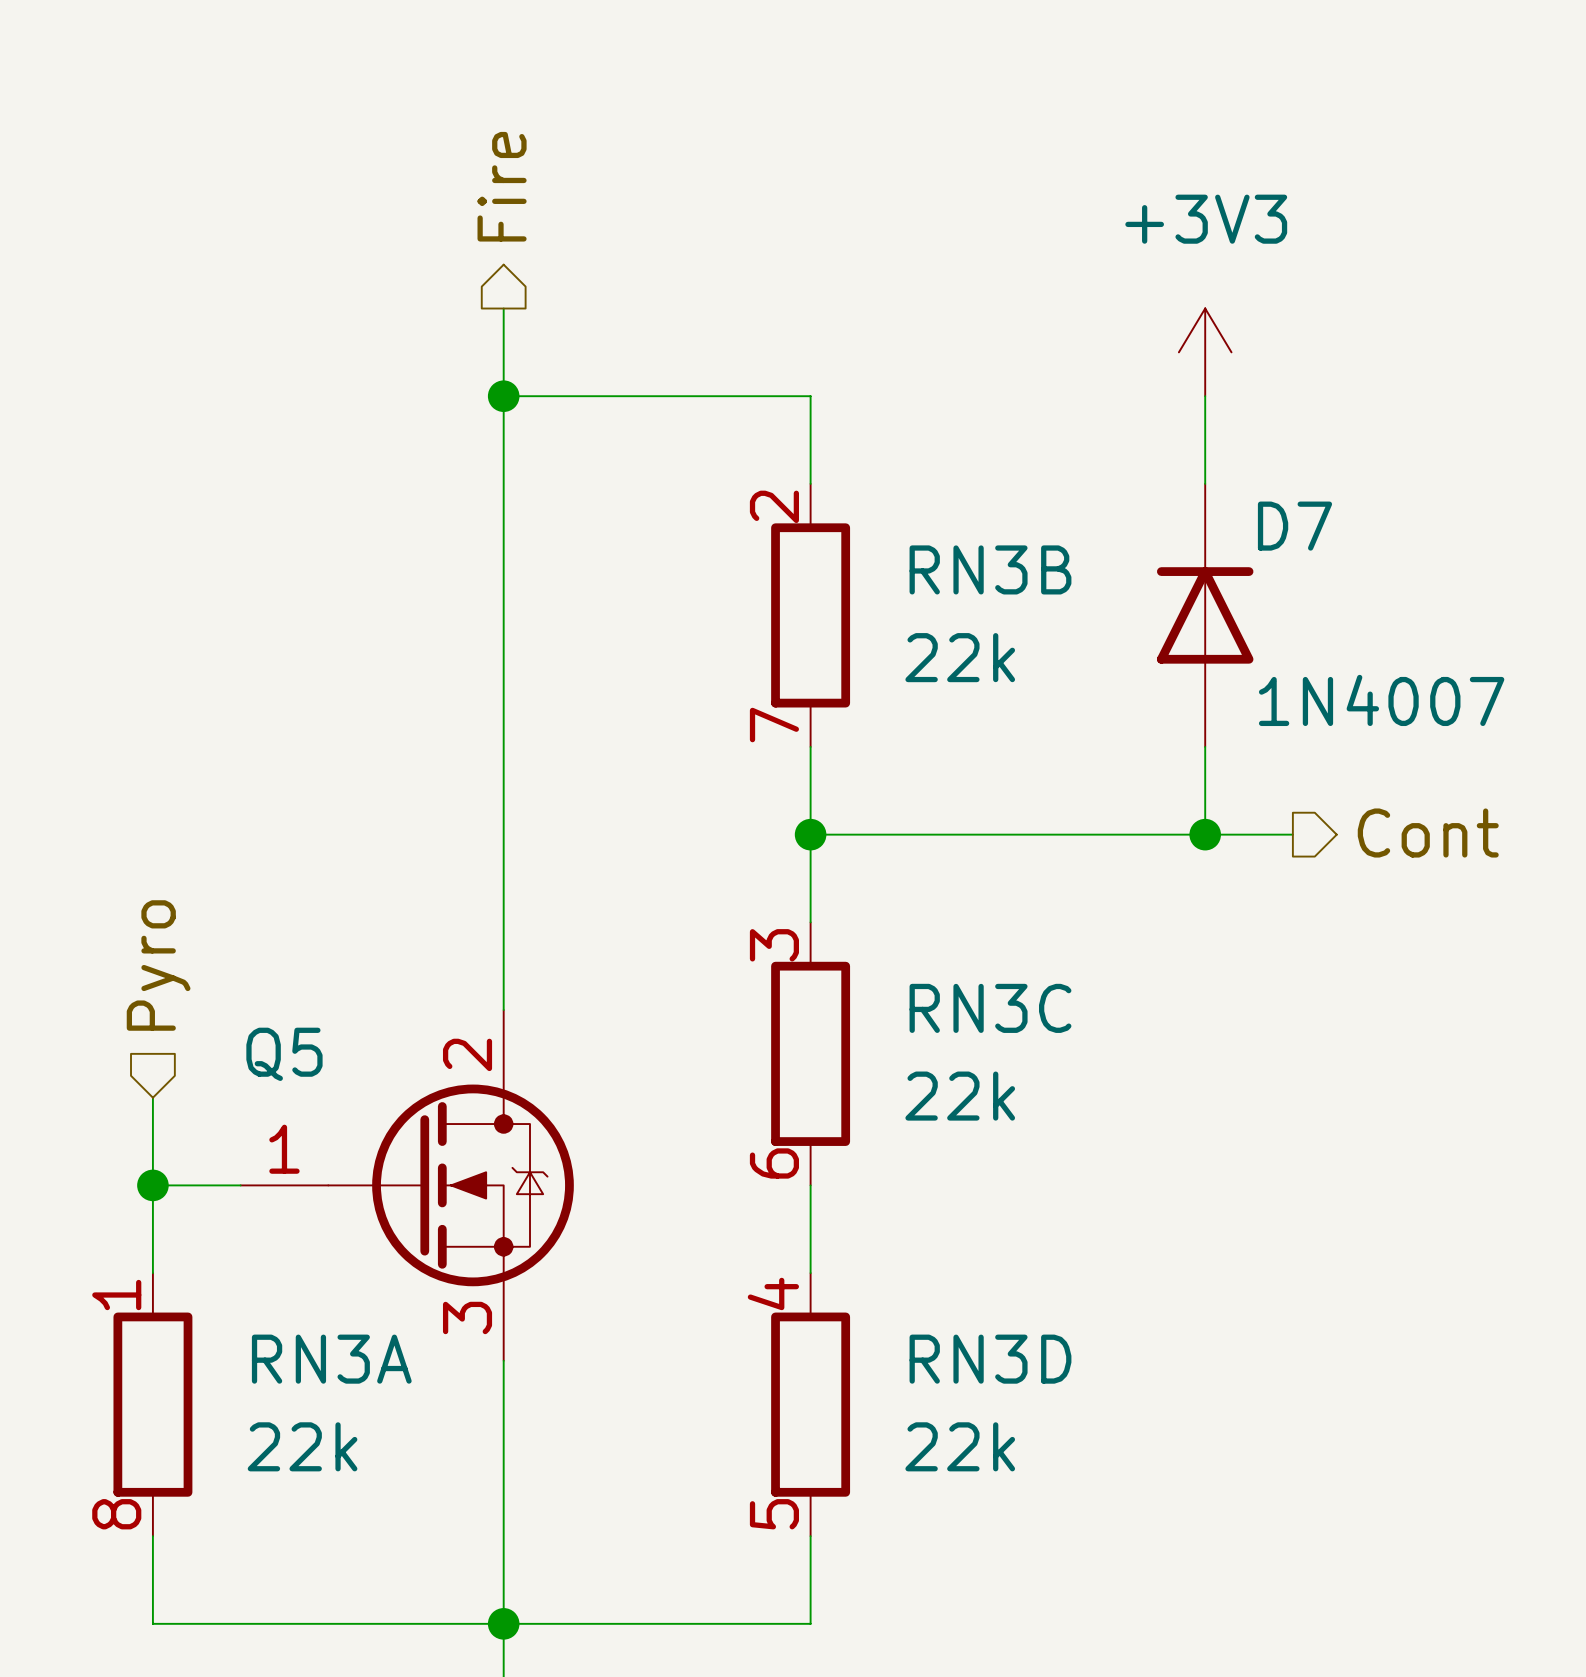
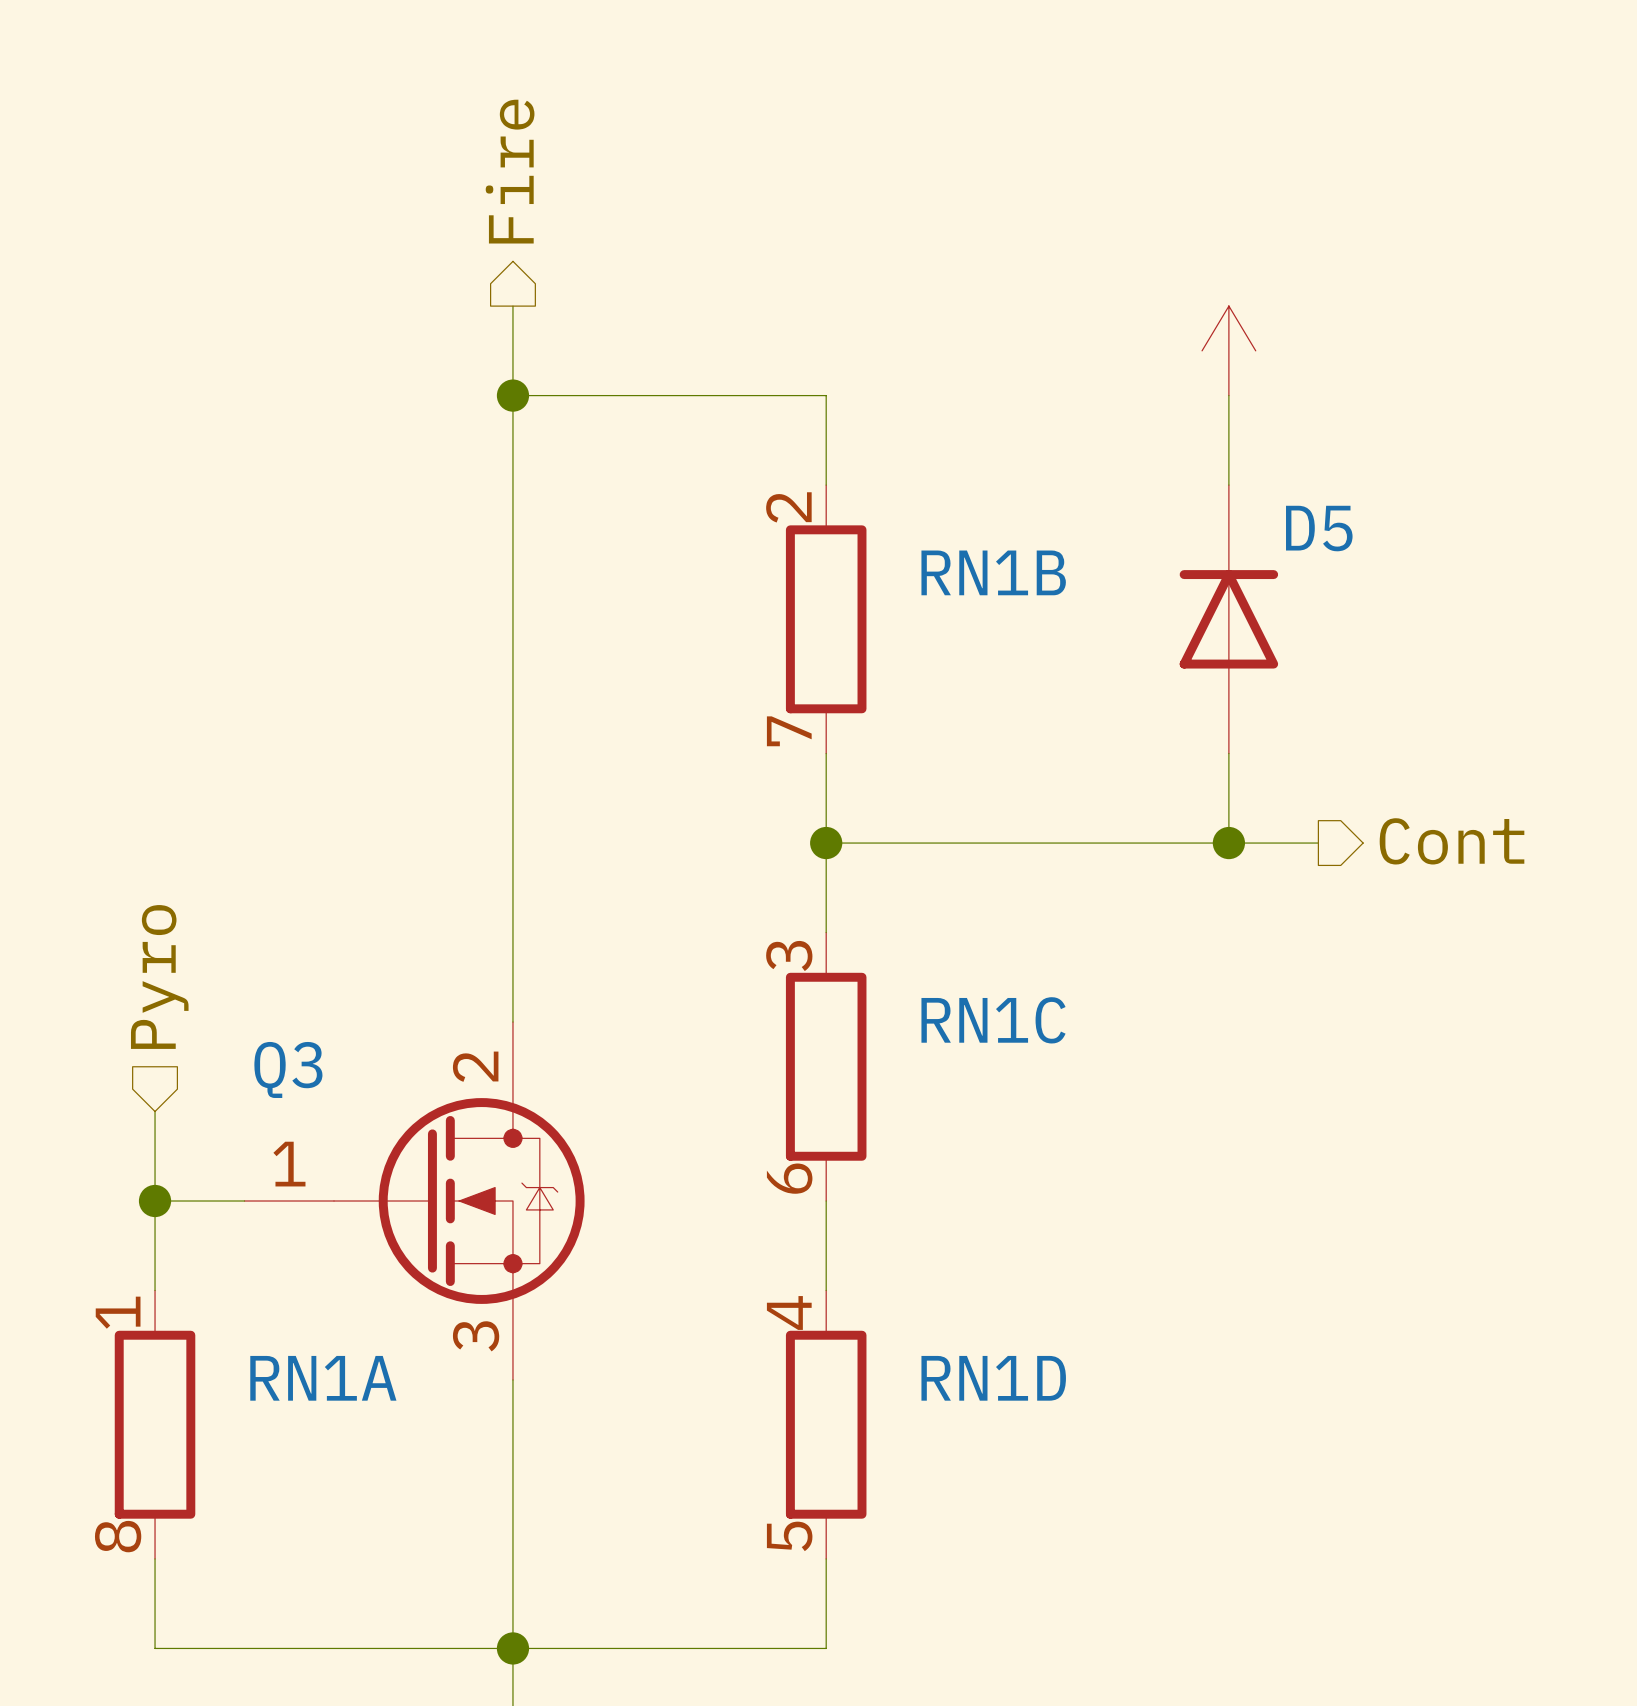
power symbol text: +3V3 (1206, 219) -> none
D7 name: D7 (1294, 526) -> D5 (1319, 528)
RN3B name: RN3B (990, 569) -> RN1B (993, 572)
RN3B value: 22k (960, 657) -> none
D7 value: 1N4007 (1381, 700) -> none
RN3C name: RN3C (990, 1008) -> RN1C (993, 1020)
Q5 name: Q5 (284, 1054) -> Q3 (288, 1069)
RN3C value: 22k (960, 1096) -> none
RN3A name: RN3A (331, 1359) -> RN1A (323, 1378)
RN3D name: RN3D (990, 1359) -> RN1D (993, 1378)
RN3A value: 22k (302, 1446) -> none
RN3D value: 22k (960, 1446) -> none

